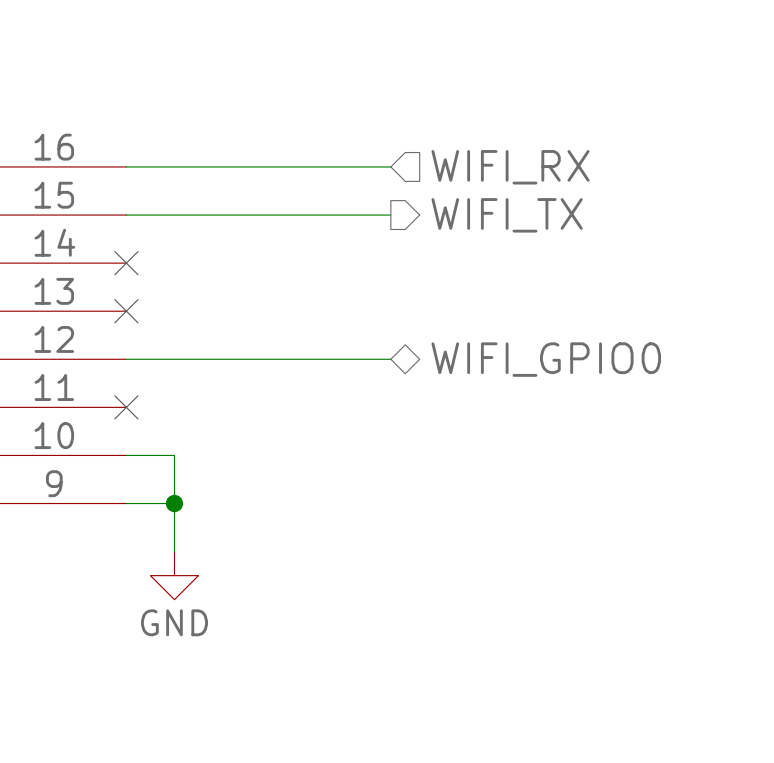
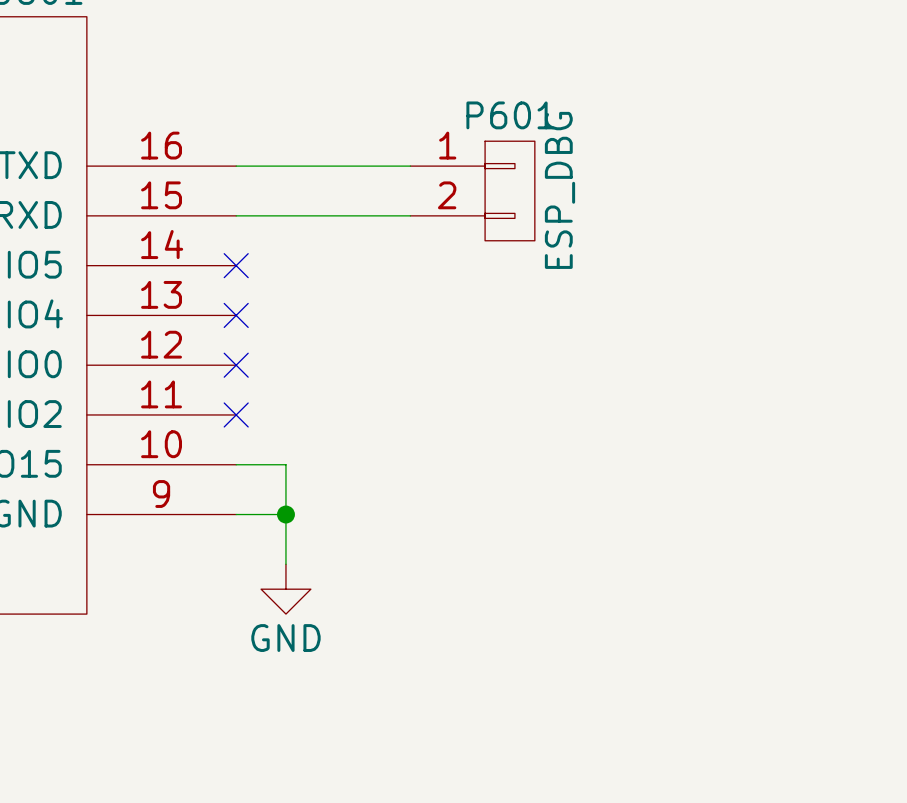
hierarchical label: WIFI_RX (510, 167) -> none
P601: none -> ESP_DBG (472, 190)
hierarchical label: WIFI_TX (507, 215) -> none
wire: (126, 359) (390, 359) -> none
no-connect mark: none -> (236, 365)
hierarchical label: WIFI_GPIO0 (546, 359) -> none

